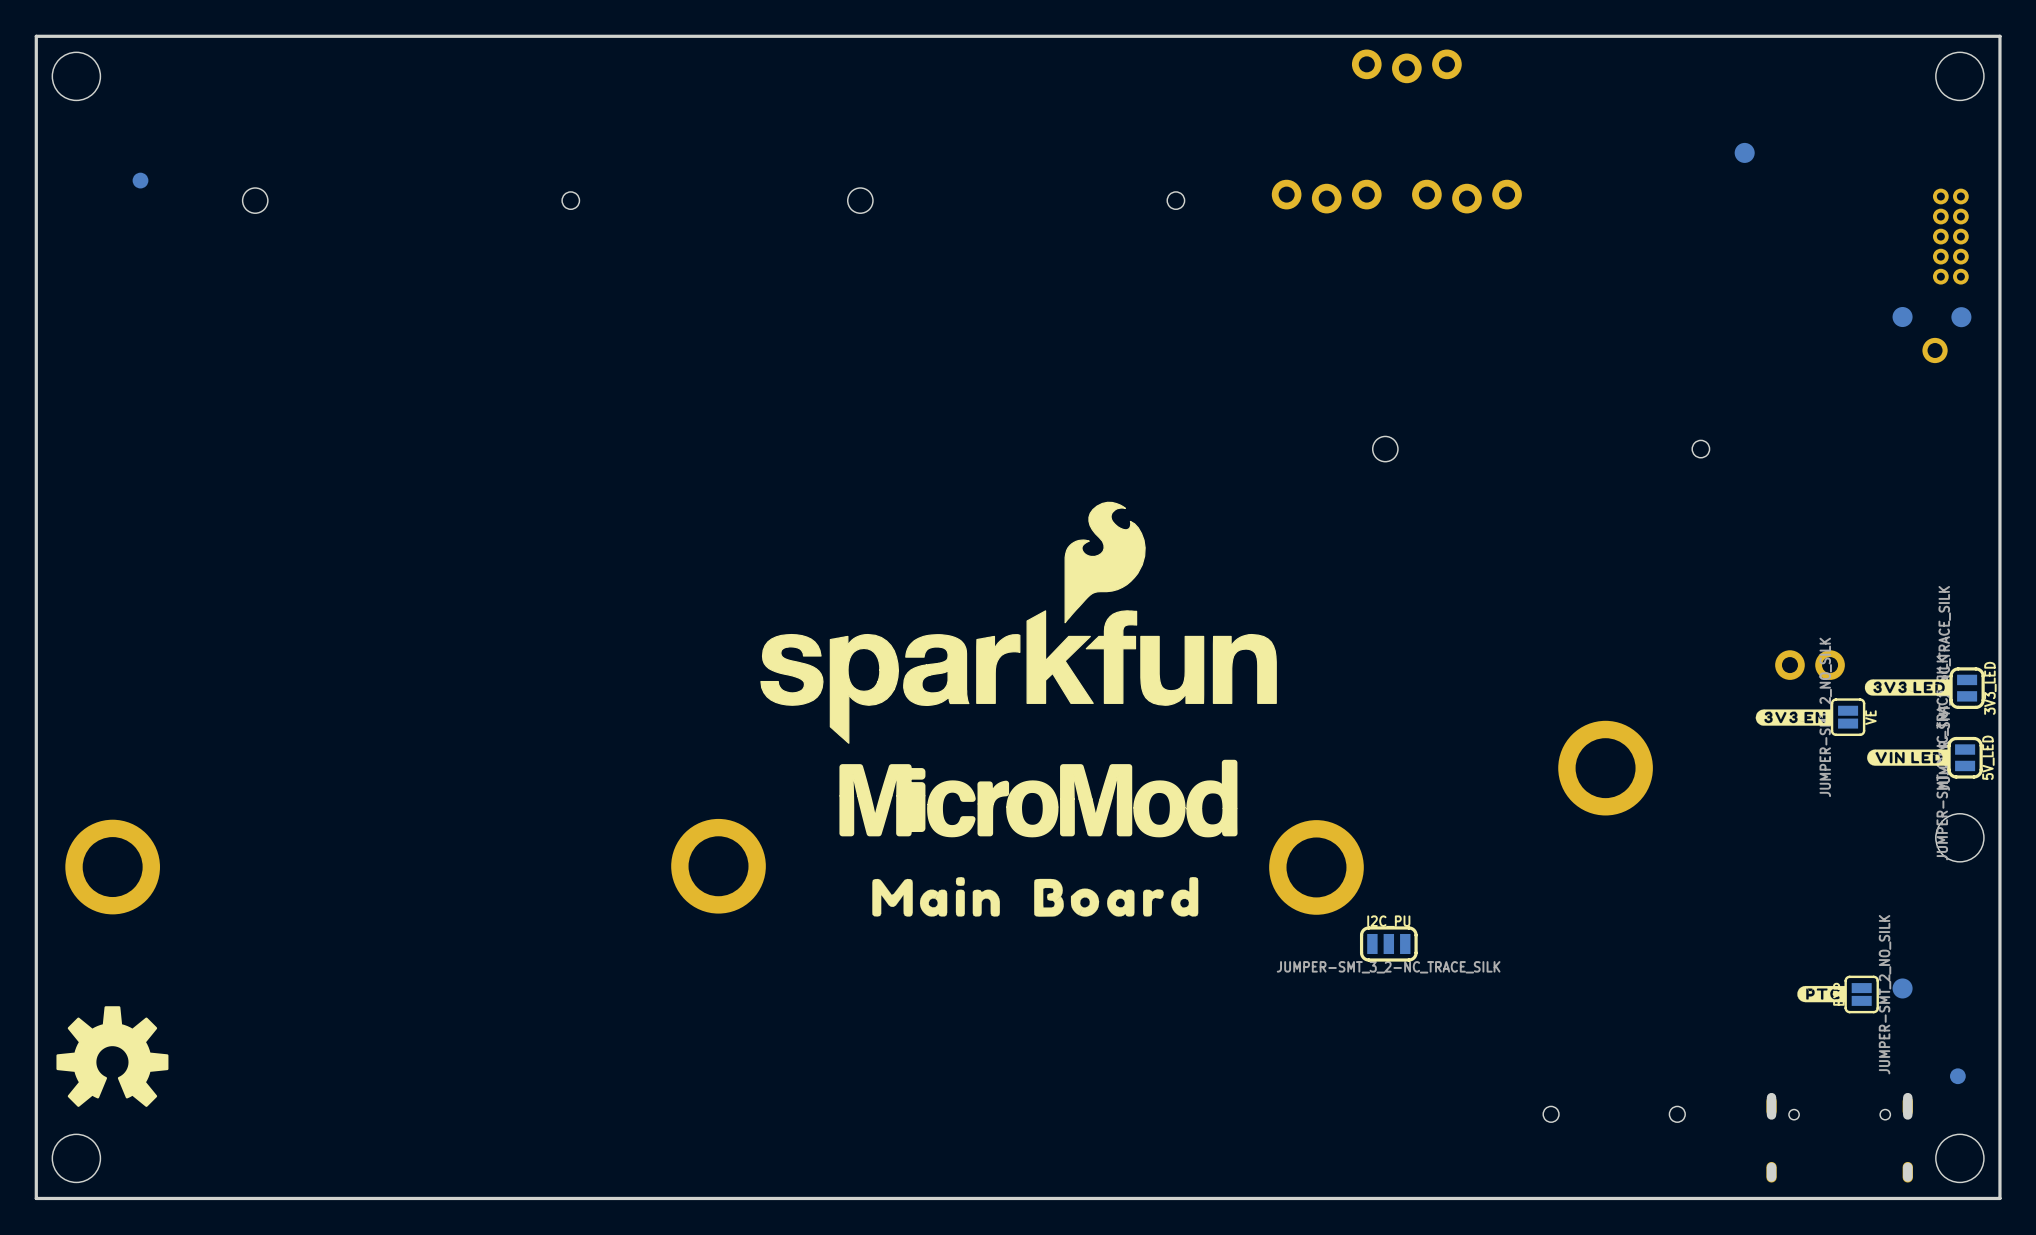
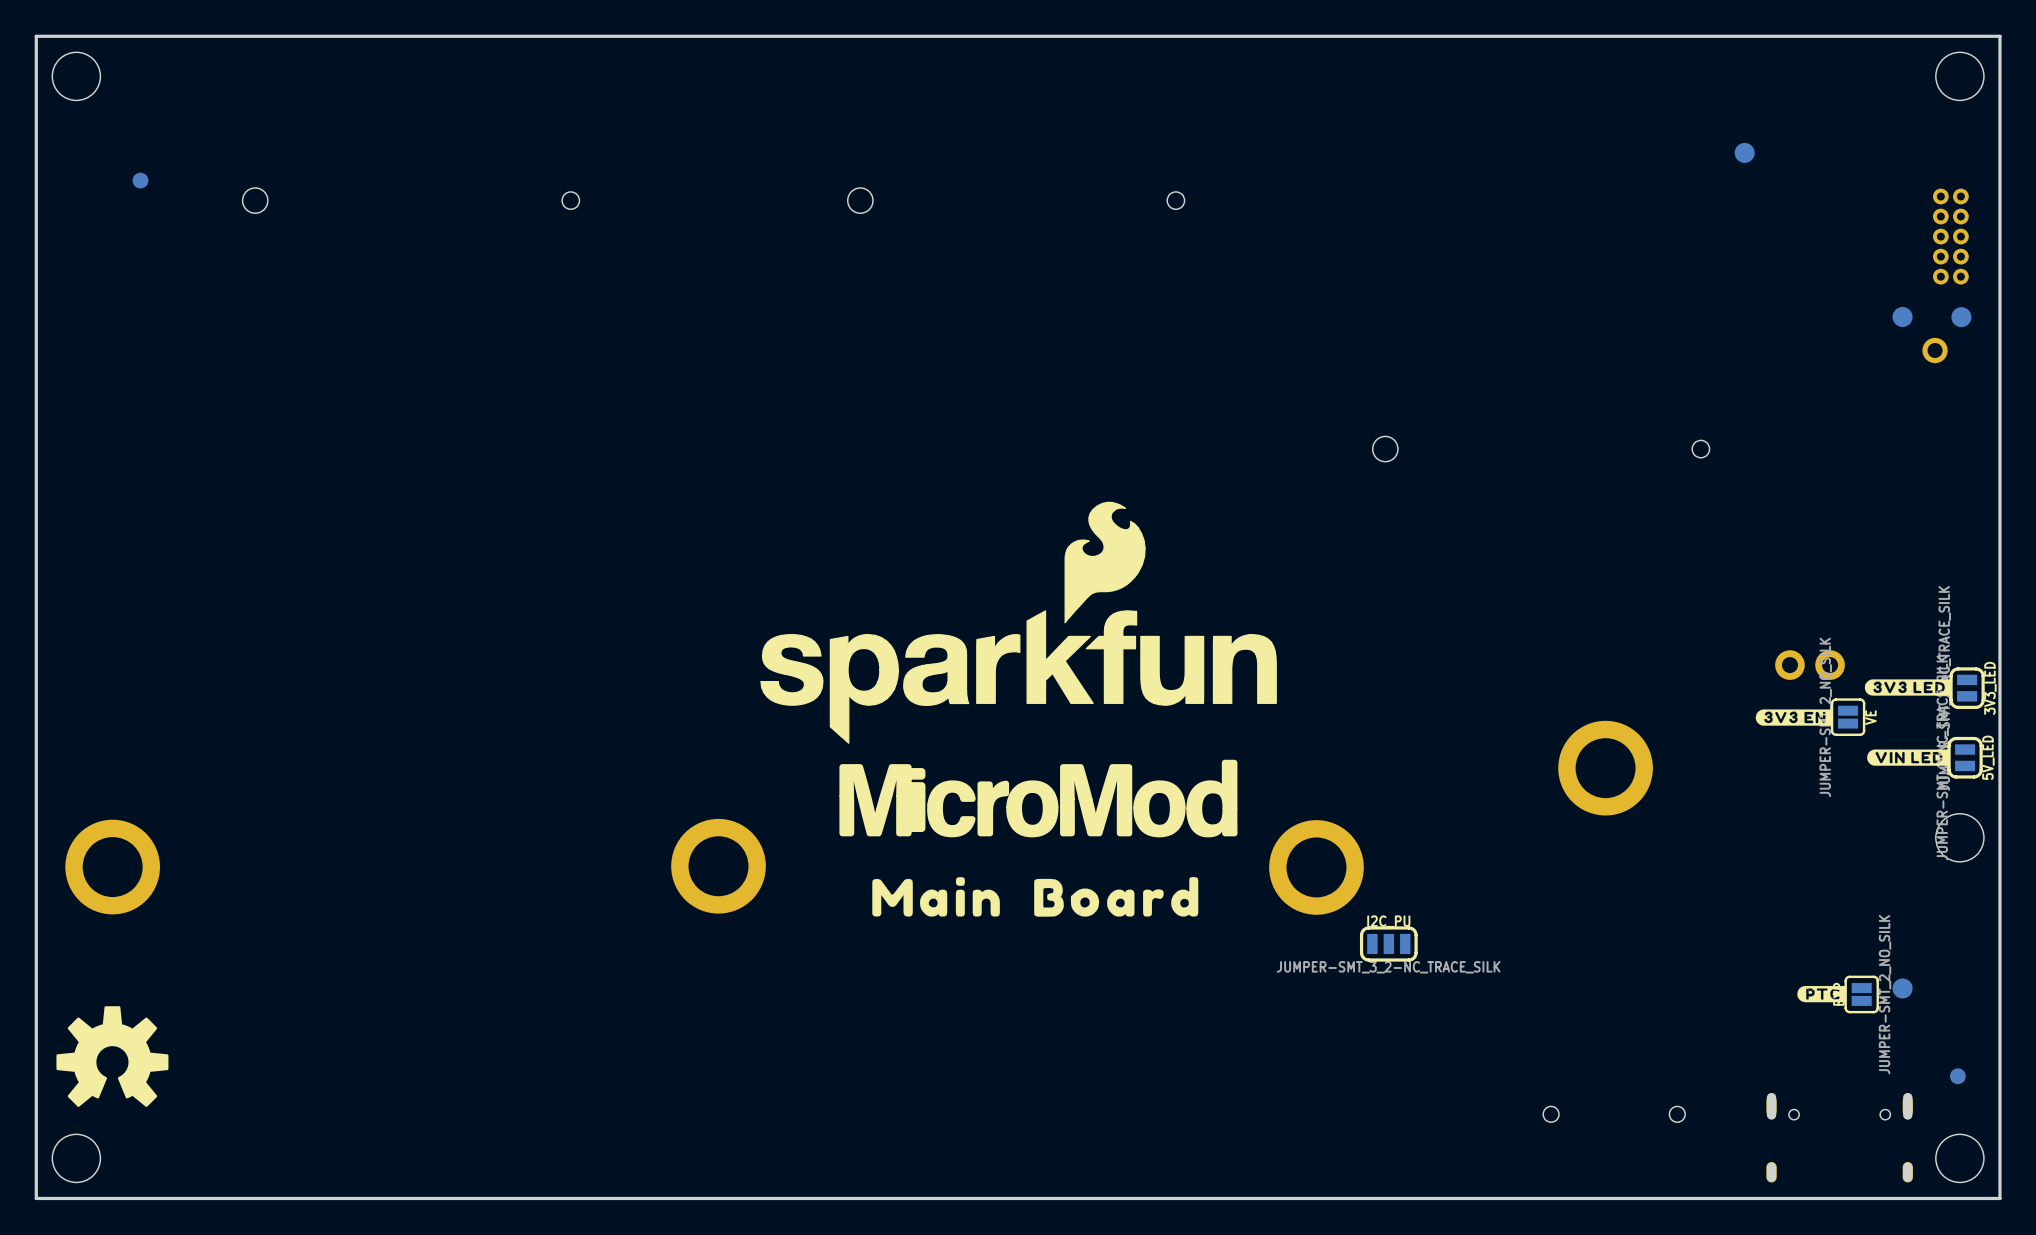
part: (1406, 66) -> none
part: (1326, 196) -> none
part: (1466, 196) -> none

